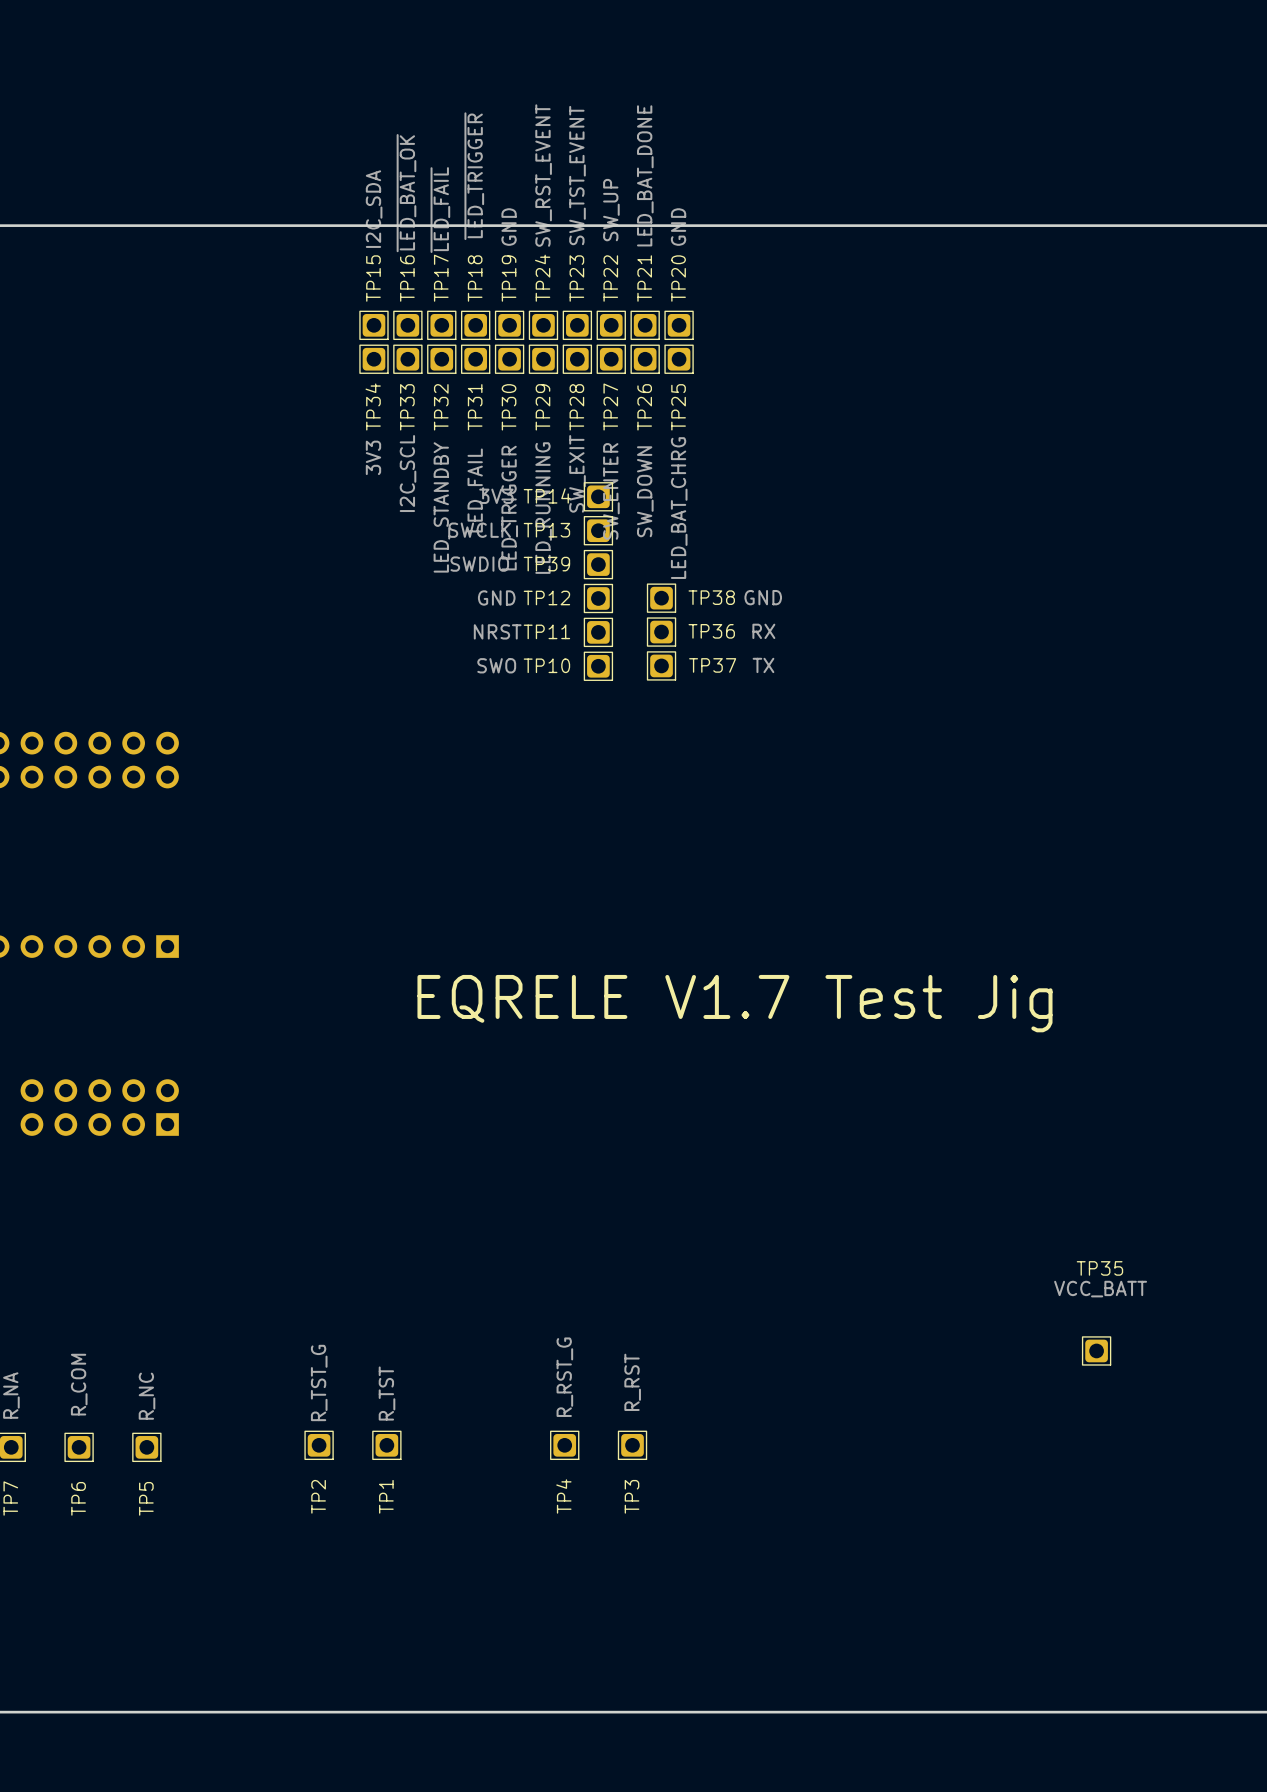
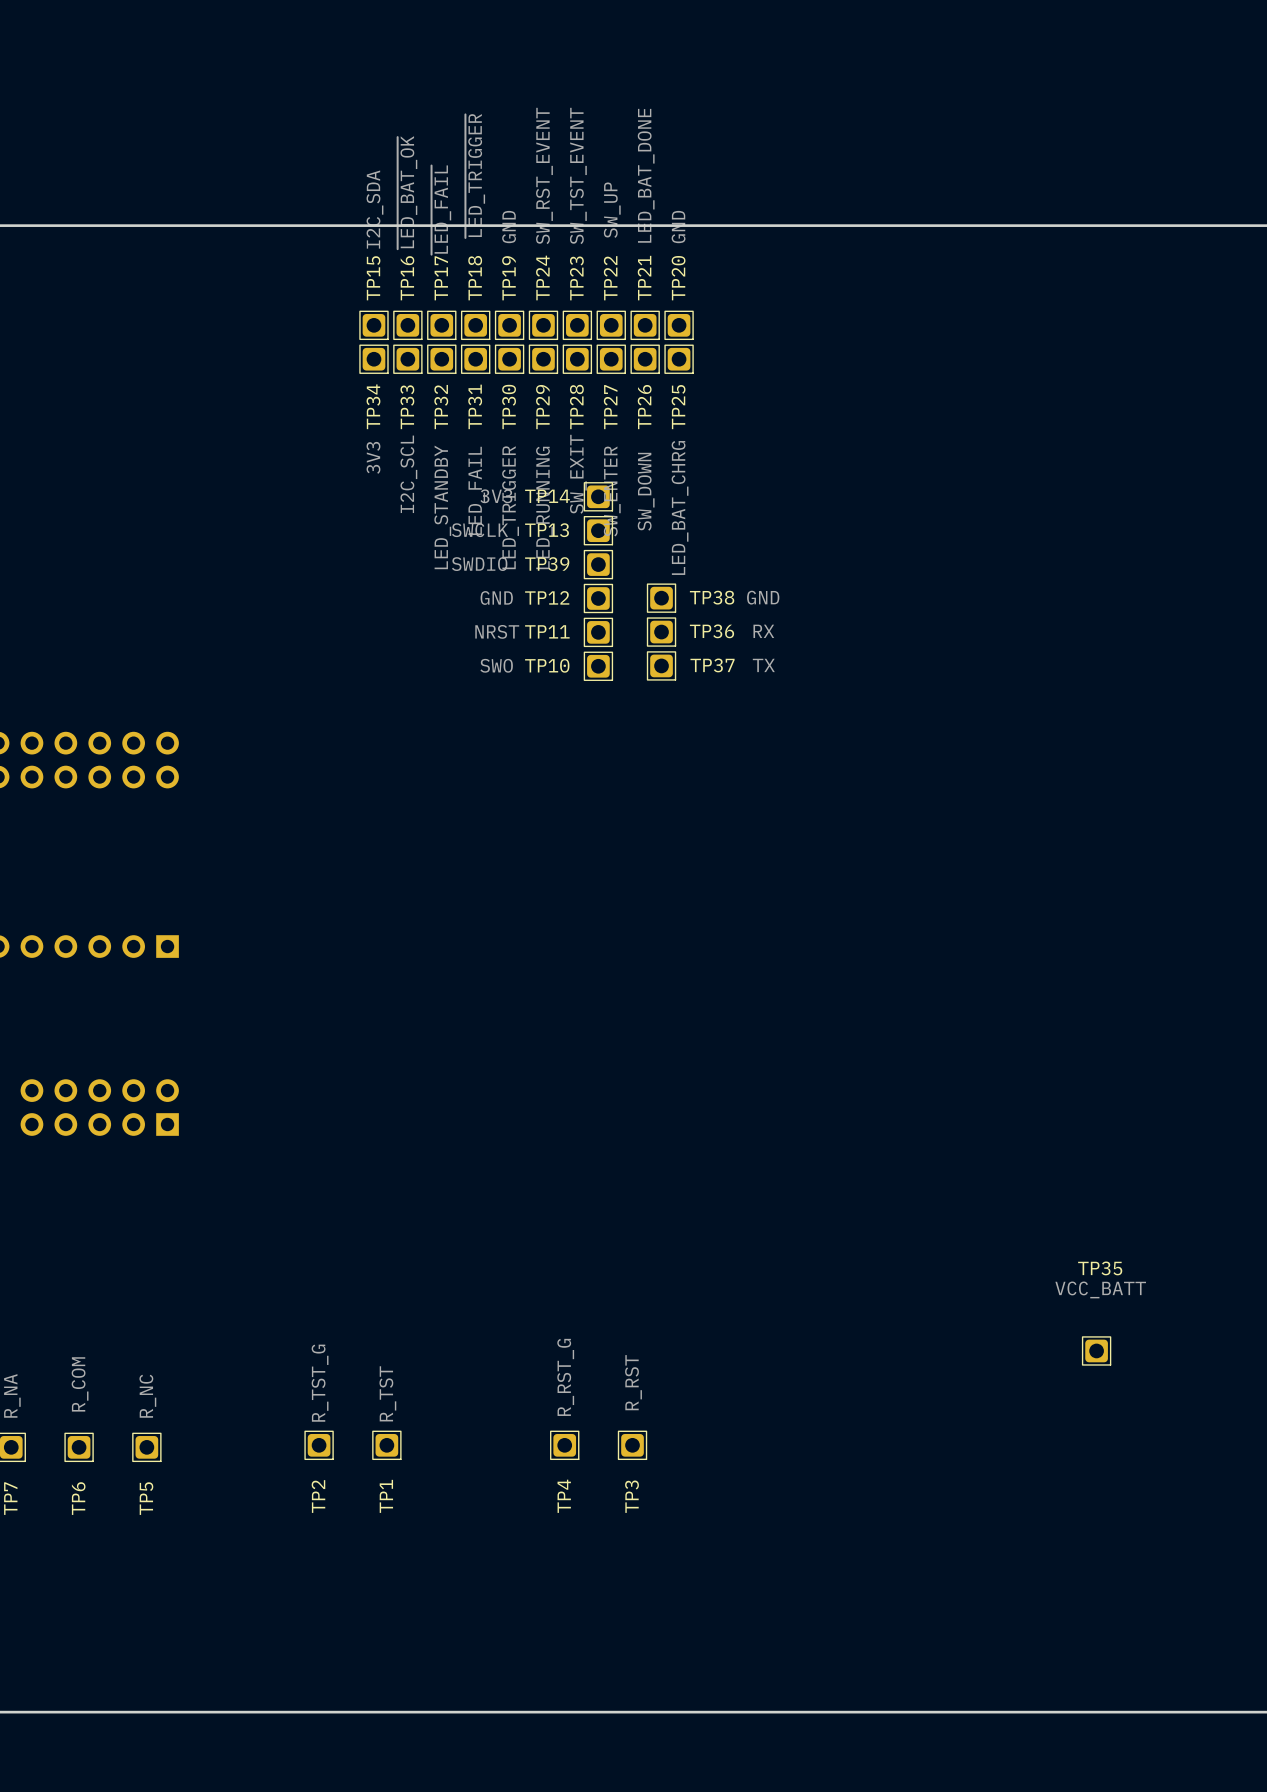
text: EQRELE V1.7 Test Jig (734, 1003) -> none

